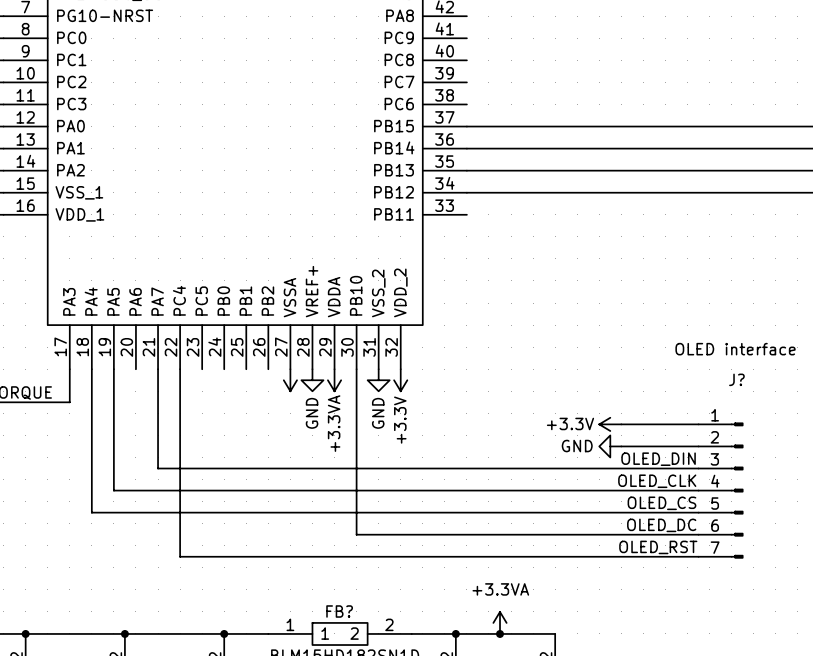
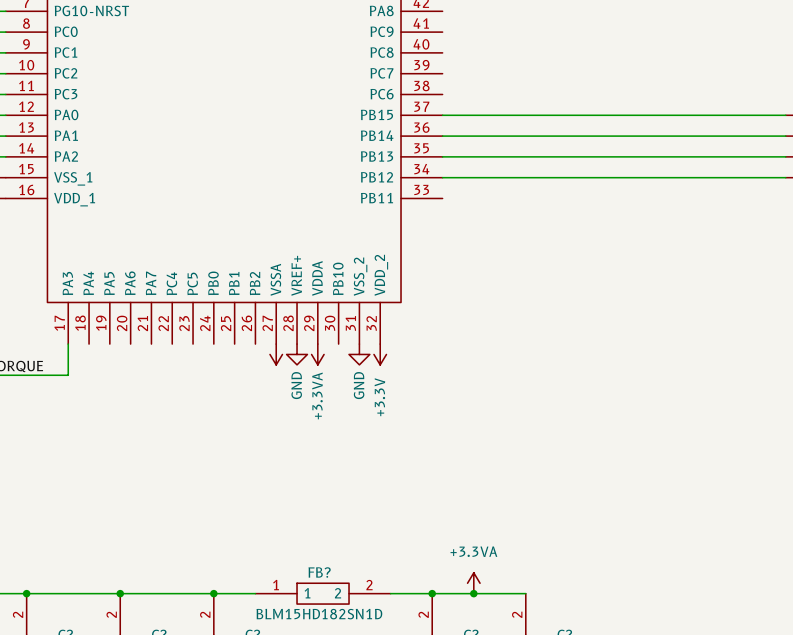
text: OLED interface (735, 349) -> none
wire: (91, 369) (91, 512) (698, 512) -> none
wire: (113, 369) (113, 490) (698, 490) -> none
wire: (158, 369) (158, 468) (698, 468) -> none
wire: (180, 369) (180, 556) (698, 556) -> none
wire: (356, 369) (356, 534) (698, 534) -> none
power symbol: +3.3V (610, 424) -> none
wire: (621, 424) (698, 424) -> none
power symbol: GND (610, 446) -> none
wire: (621, 446) (698, 446) -> none
label: OLED_DIN (658, 459) -> none
label: OLED_CLK (657, 481) -> none
J?: (720, 490) -> none
label: OLED_CS (661, 503) -> none
label: OLED_DC (661, 525) -> none
label: OLED_RST (658, 547) -> none

